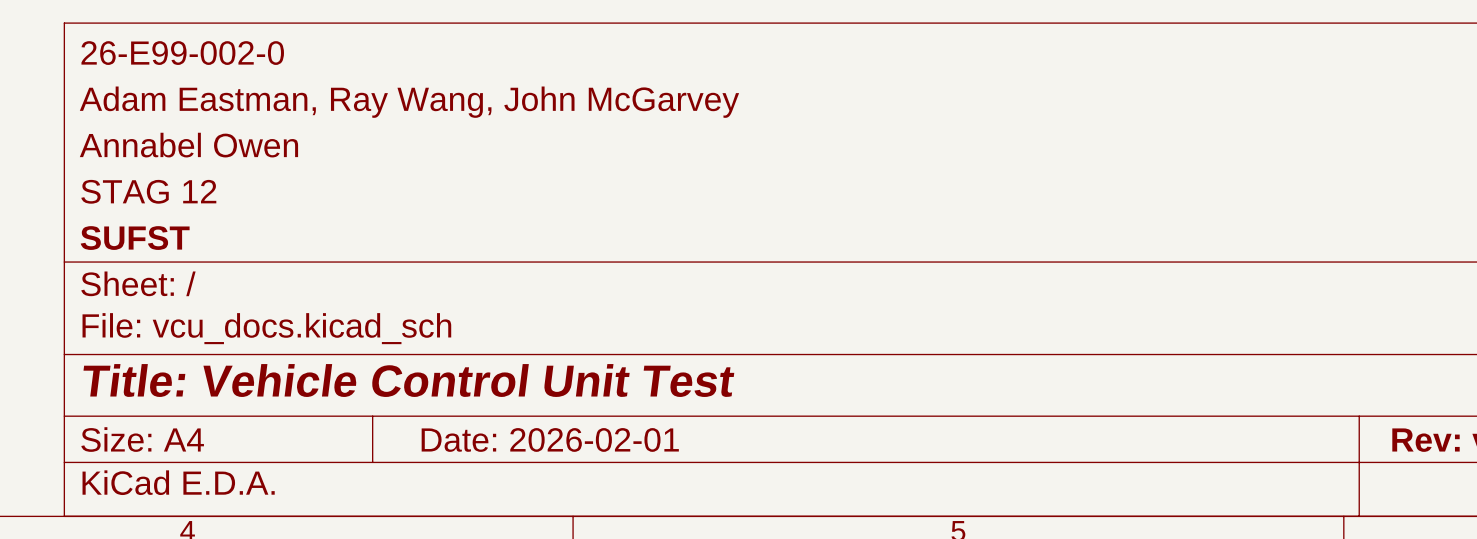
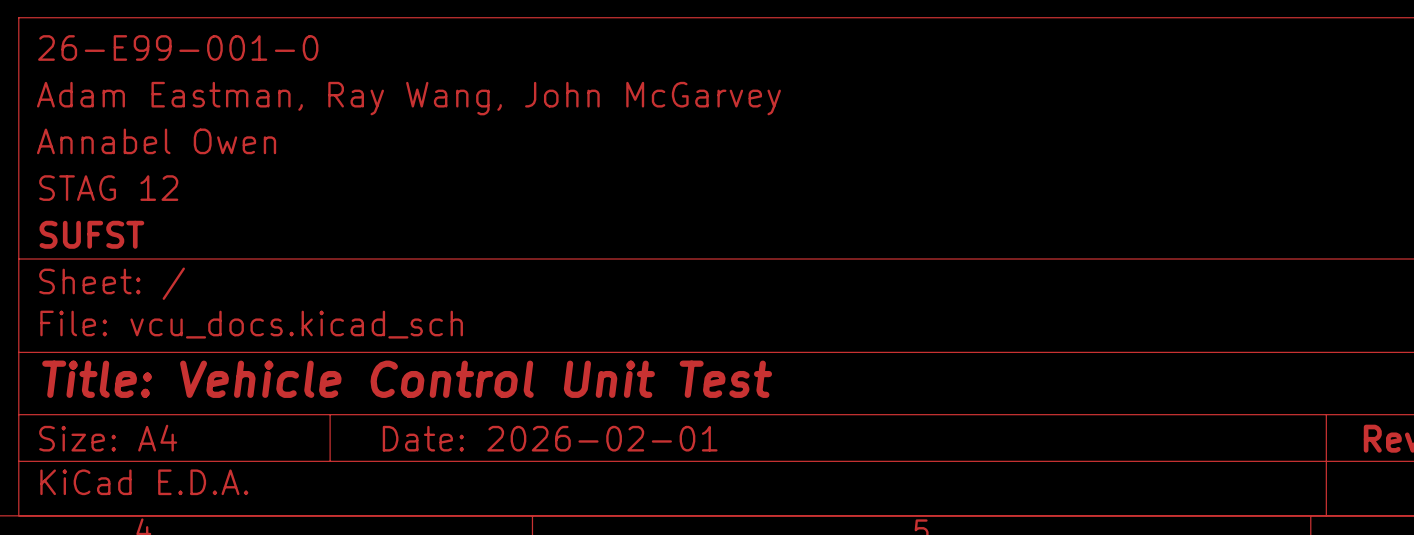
title block: 26-E99-002-0 (182, 53) -> 26-E99-001-0 (178, 47)

